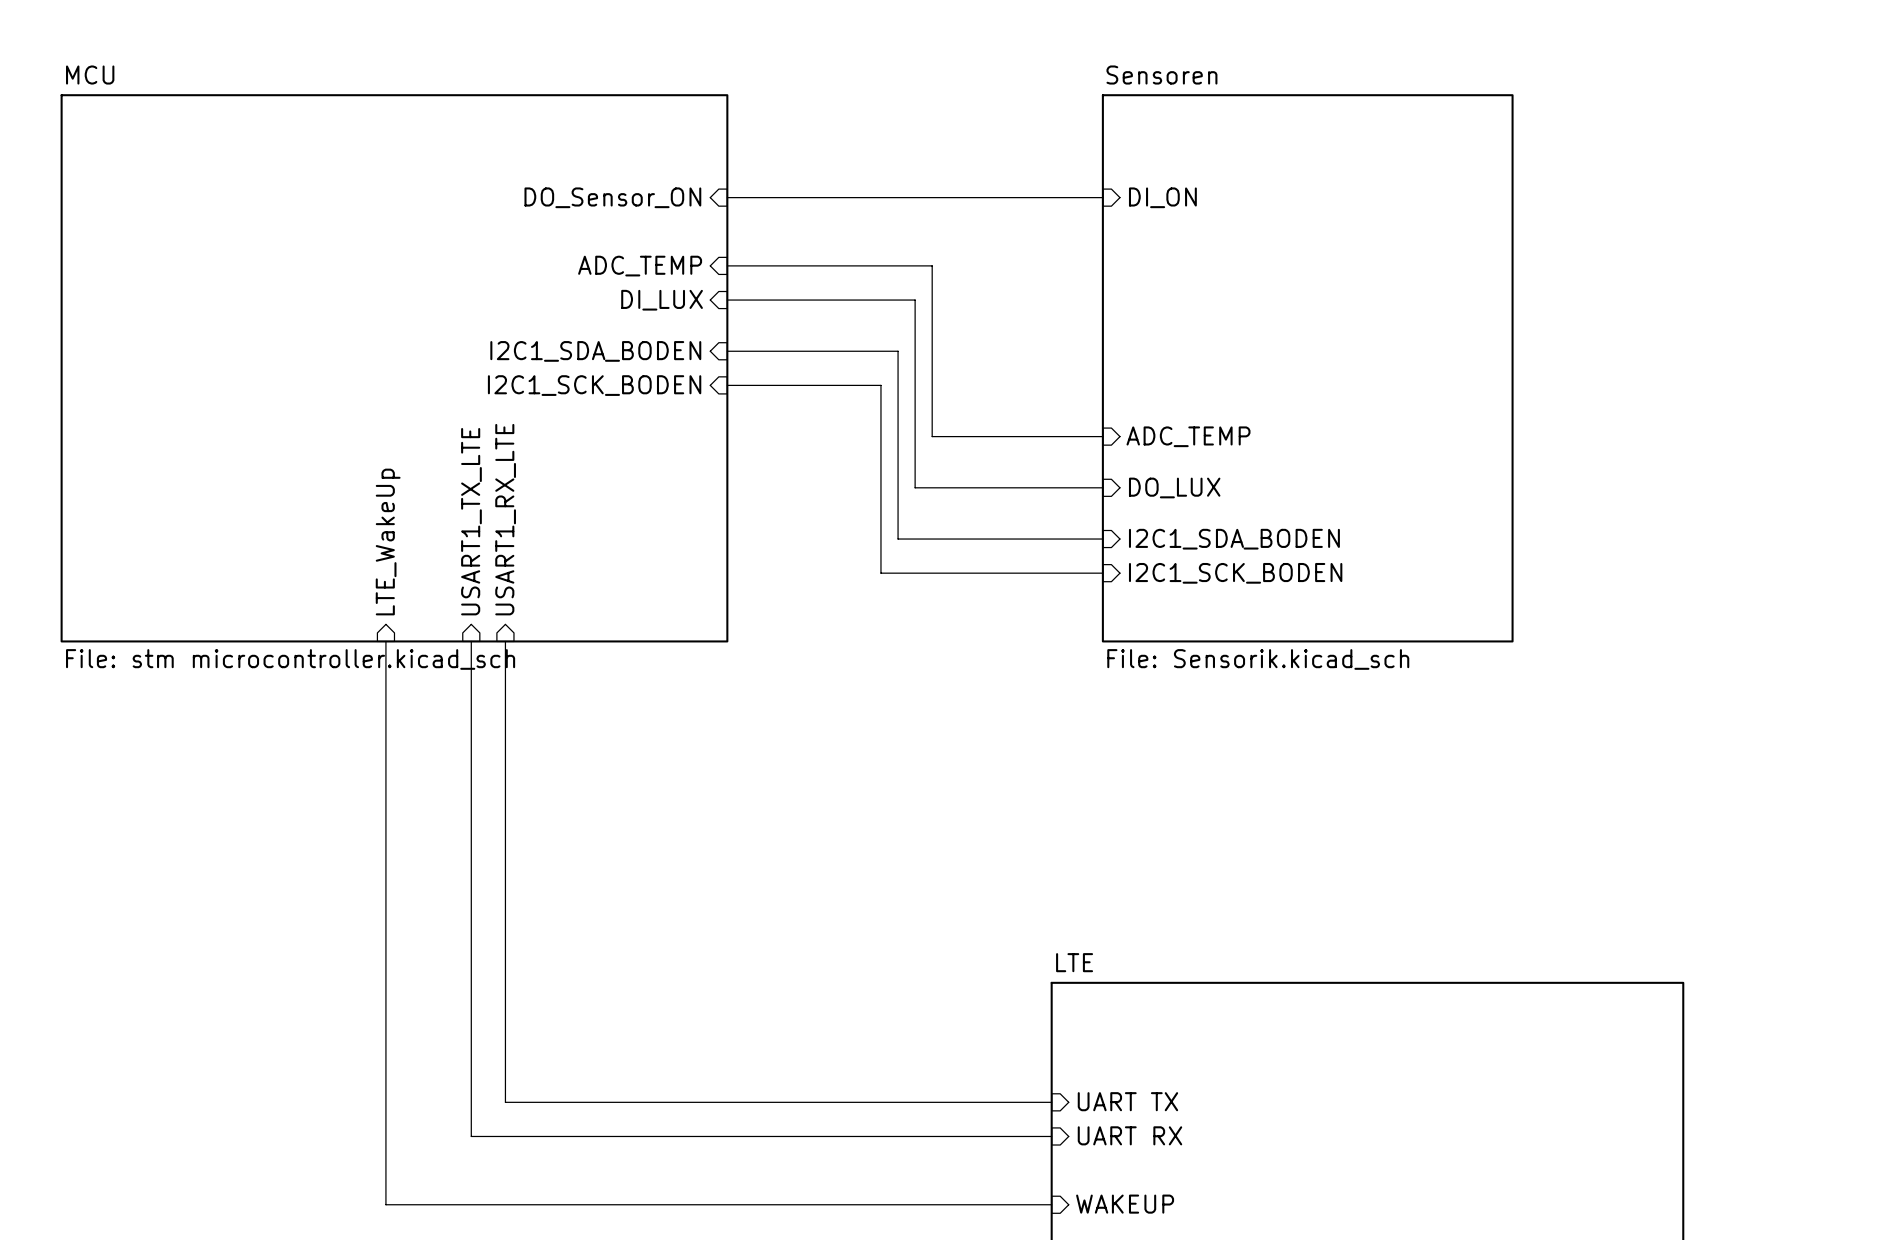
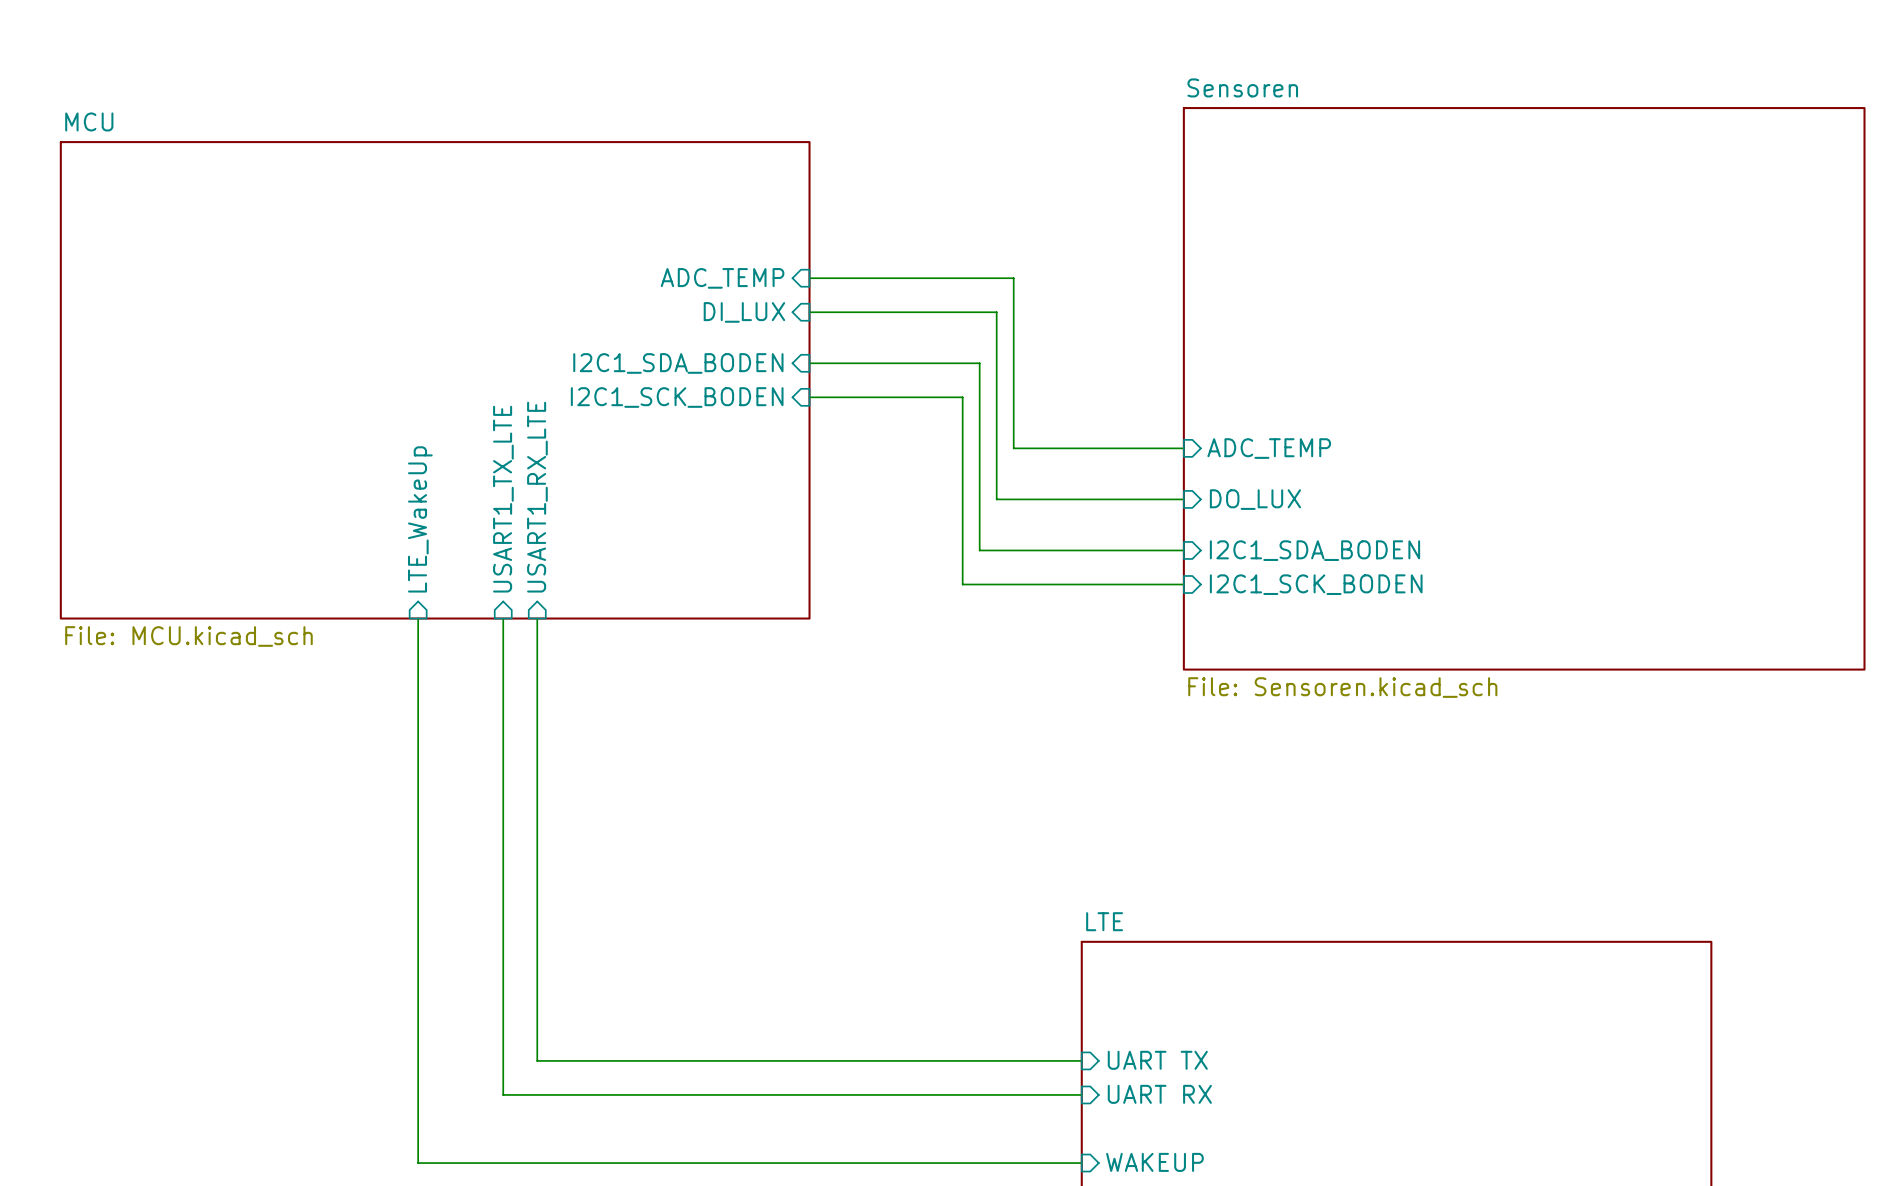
sheet pin: DO_Sensor_ON (612, 197) -> none
wire: (727, 197) (1102, 197) -> none
sheet pin: DI_ON (1162, 197) -> none
wire: (727, 265) (932, 265) (932, 436) (1102, 436) -> none
sheet pin position: ADC_TEMP (640, 266) -> ADC_TEMP (722, 278)
sheet pin position: DI_LUX (662, 300) -> DI_LUX (744, 312)
wire: (727, 300) (915, 300) (915, 487) (983, 487) -> (809, 278) (1013, 278) (1013, 448)
sheet pin position: I2C1_SDA_BODEN (595, 351) -> I2C1_SDA_BODEN (678, 363)
wire: (727, 351) (778, 351) -> none
wire: (898, 351) (898, 539) (966, 539) -> (928, 312) (996, 312) (996, 499)
sheet MCU: File: stm microcontroller.kicad_sch (394, 368) -> none
sheet Sensoren: File: Sensorik.kicad_sch (1307, 368) -> none
sheet pin position: I2C1_SCK_BODEN (594, 385) -> I2C1_SCK_BODEN (677, 397)
wire: (727, 385) (880, 385) (880, 573) (1102, 573) -> (809, 397) (962, 397) (962, 584) (1183, 584)
wire: none -> (809, 363) (979, 363) (979, 550) (1183, 550)
sheet MCU: none -> File: MCU.kicad_sch (435, 380)
sheet Sensoren: none -> File: Sensoren.kicad_sch (1524, 388)
sheet pin position: ADC_TEMP (1188, 436) -> ADC_TEMP (1269, 448)
wire: none -> (1132, 448) (1183, 448)
sheet pin position: DO_LUX (1174, 487) -> DO_LUX (1255, 499)
sheet pin position: USART1_RX_LTE (505, 519) -> USART1_RX_LTE (537, 497)
sheet pin position: USART1_TX_LTE (471, 521) -> USART1_TX_LTE (503, 499)
wire: none -> (1132, 499) (1183, 499)
sheet pin position: I2C1_SDA_BODEN (1234, 539) -> I2C1_SDA_BODEN (1314, 550)
sheet pin position: LTE_WakeUp (388, 542) -> LTE_WakeUp (420, 519)
sheet pin position: I2C1_SCK_BODEN (1235, 573) -> I2C1_SCK_BODEN (1316, 584)
wire: (385, 641) (385, 658) -> none
wire: (471, 641) (471, 658) -> none
wire: (505, 641) (505, 658) -> none

